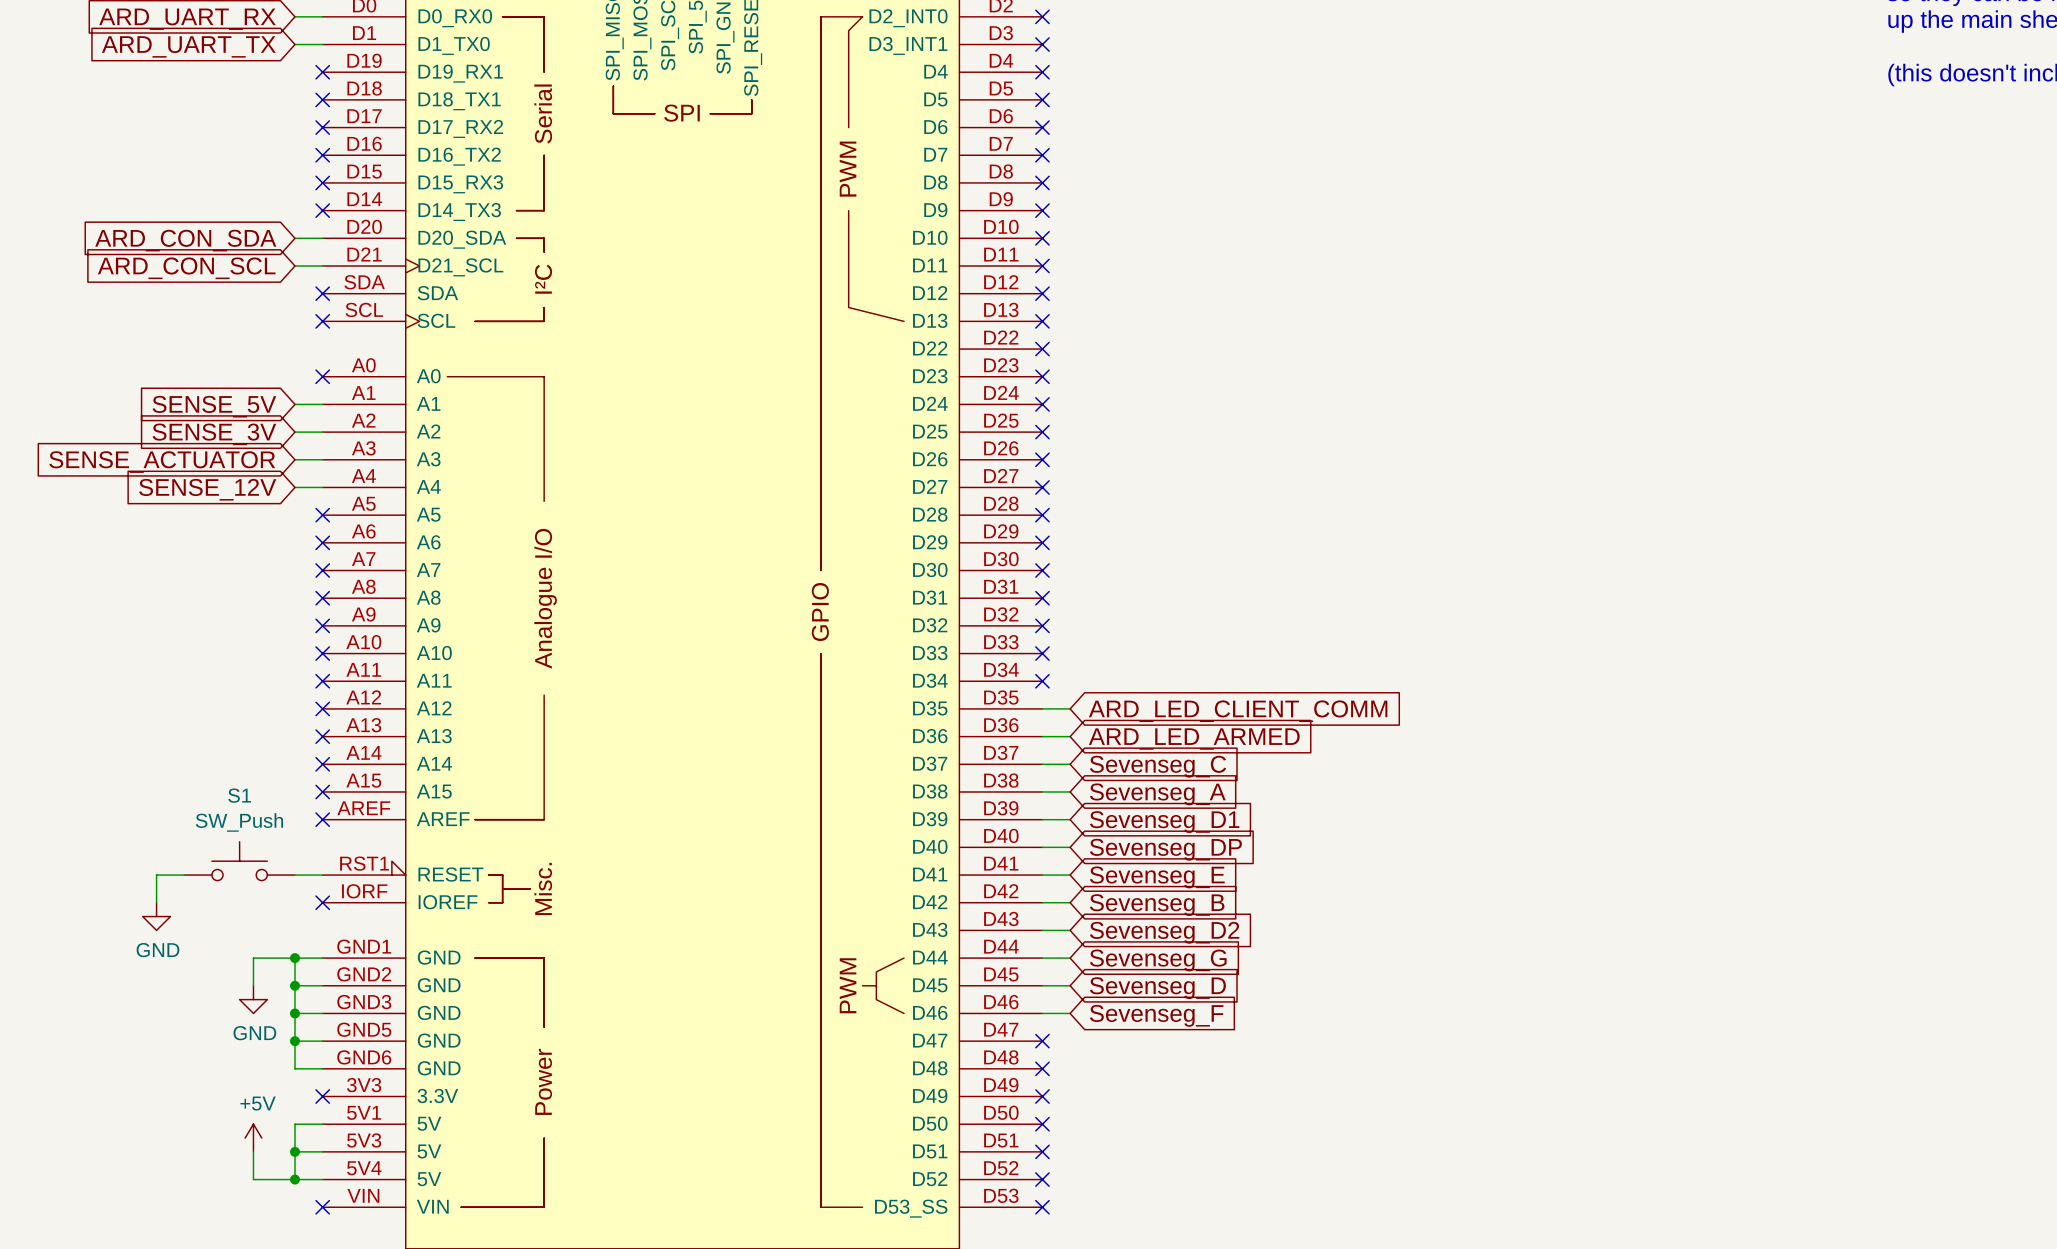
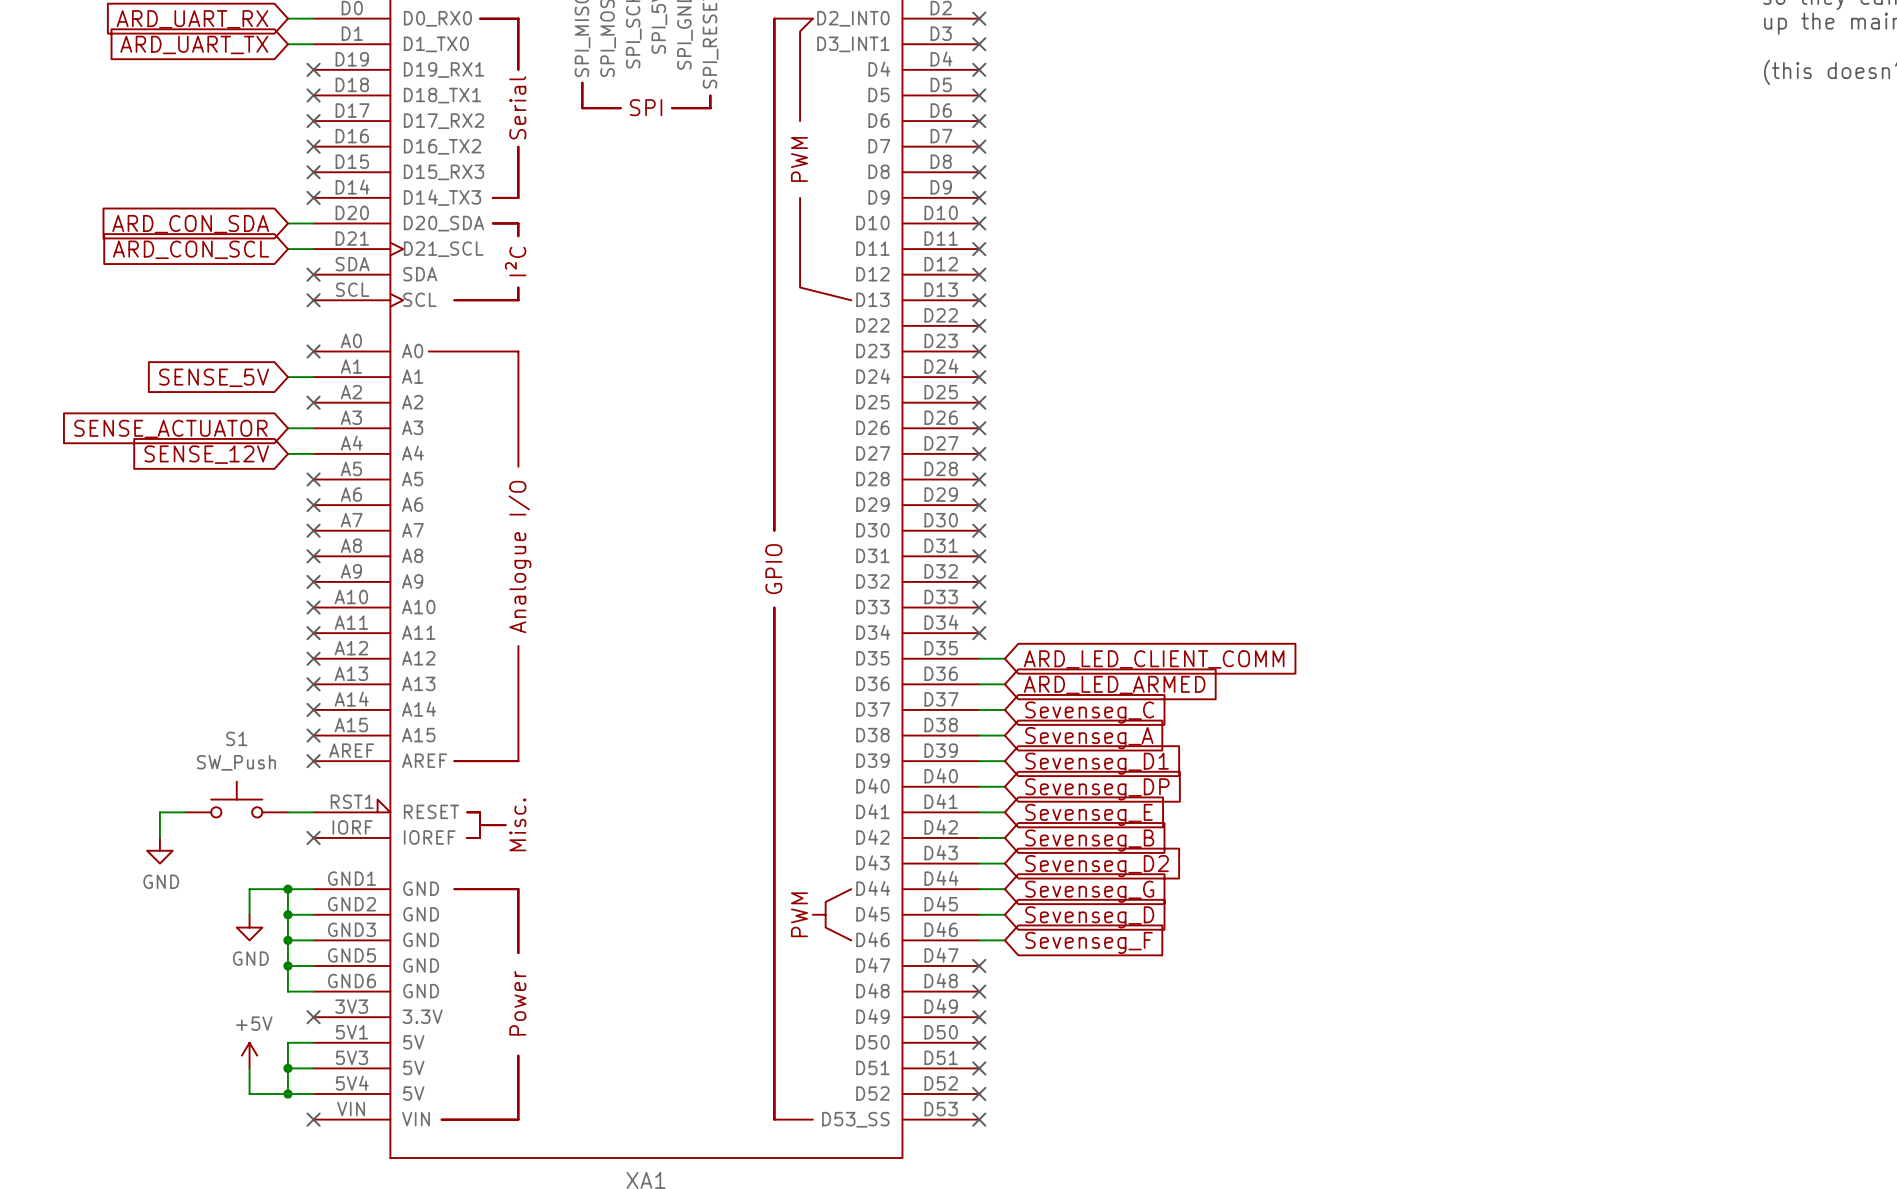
wire: (294, 432) (322, 432) -> none
no-connect mark: none -> (313, 402)
global label: SENSE_3V (214, 434) -> none

